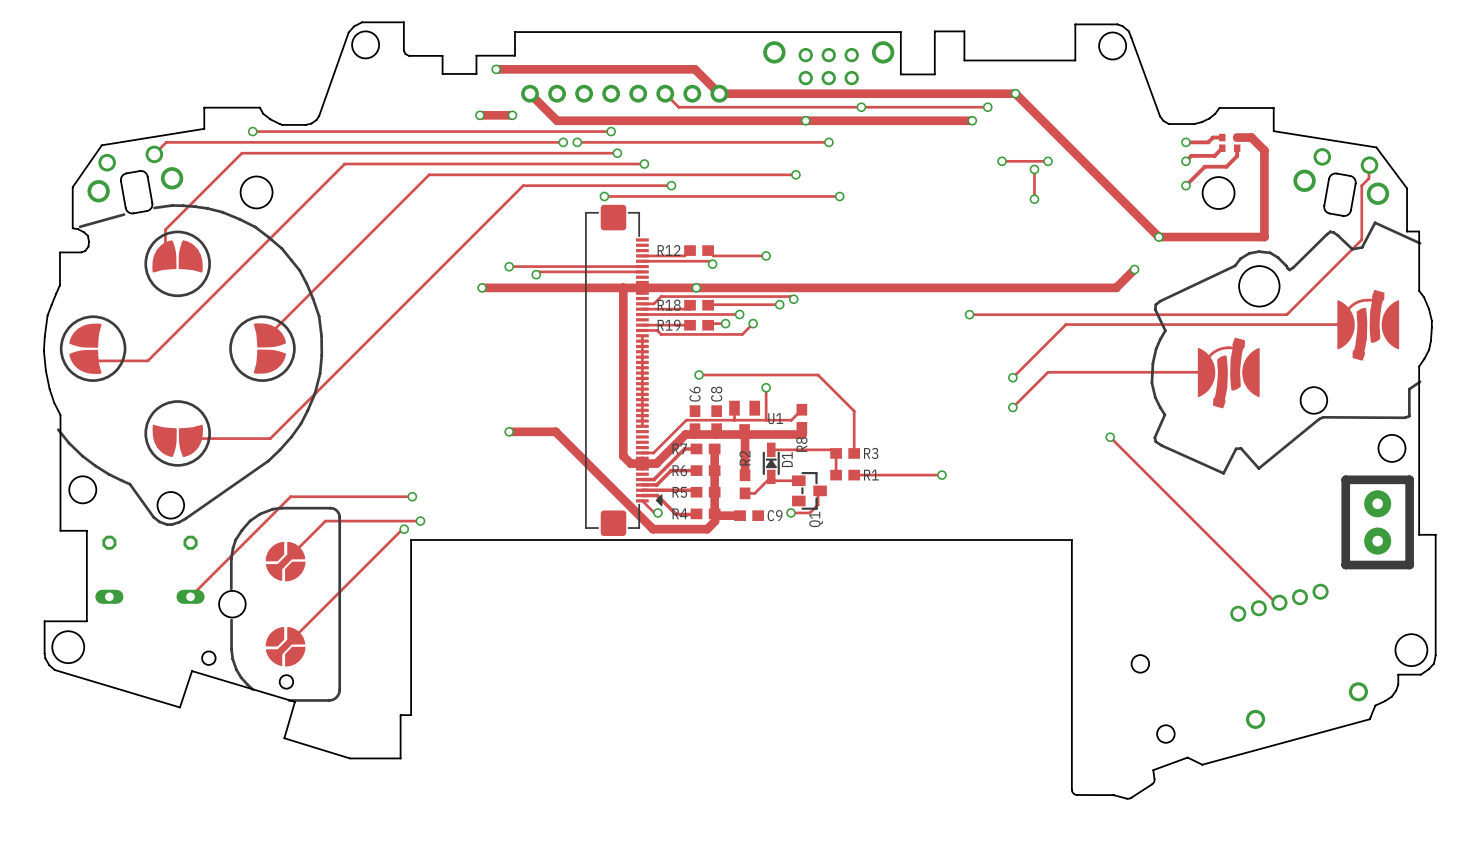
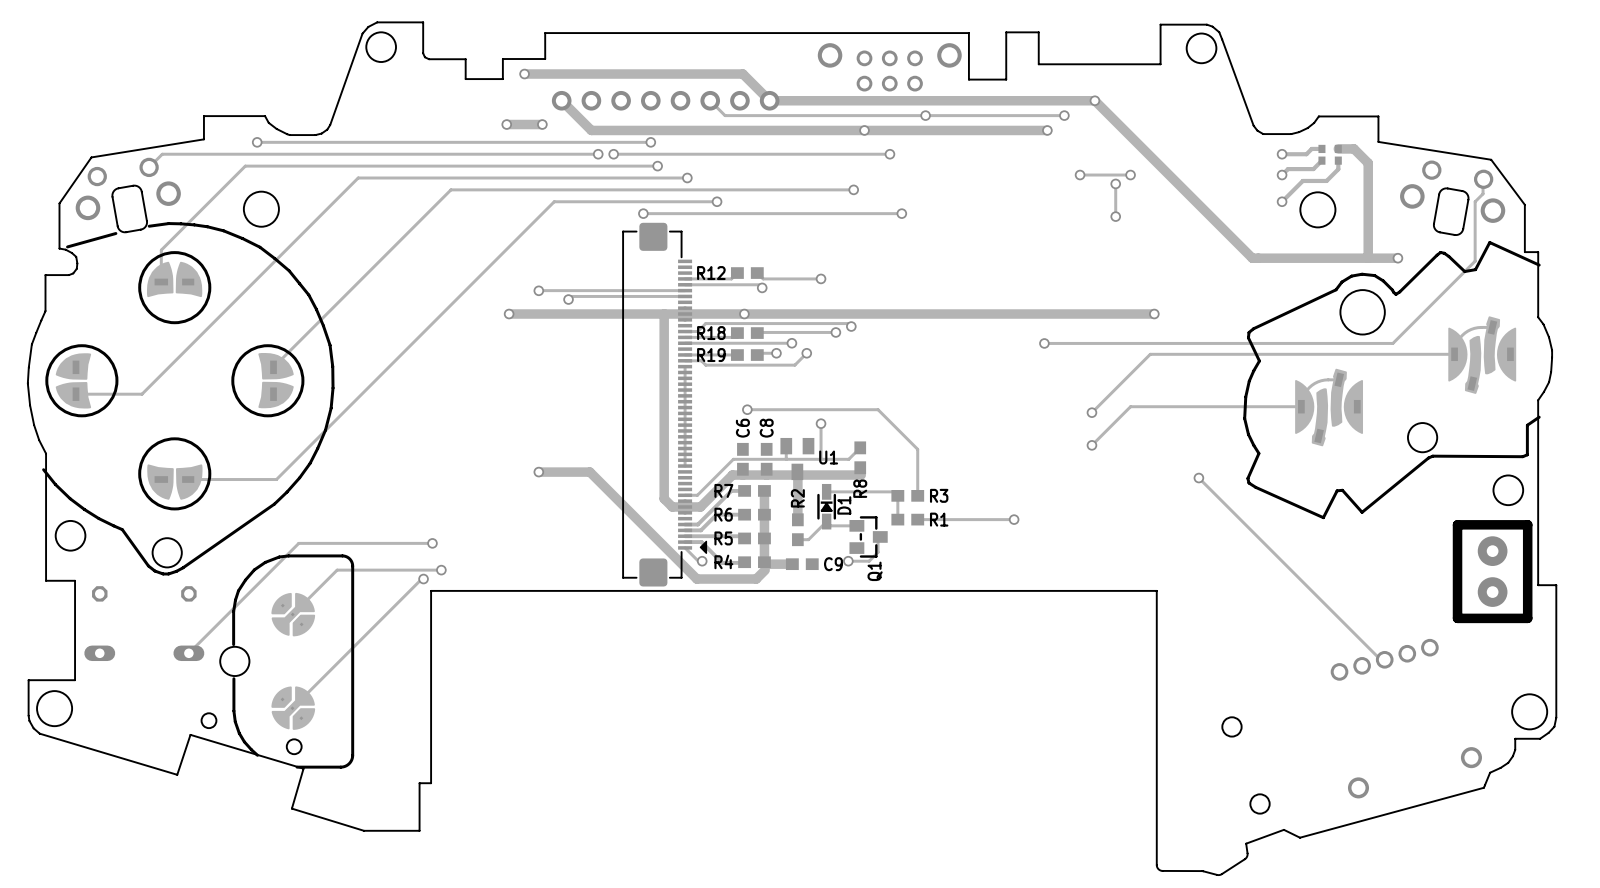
via: (1158, 237) -> none
track: none -> (1368, 258) (1397, 258)
via: none -> (1397, 258)
track: (1134, 269) (1116, 287) (1069, 287) -> none
via: (1134, 269) -> none
via: none -> (1154, 314)

